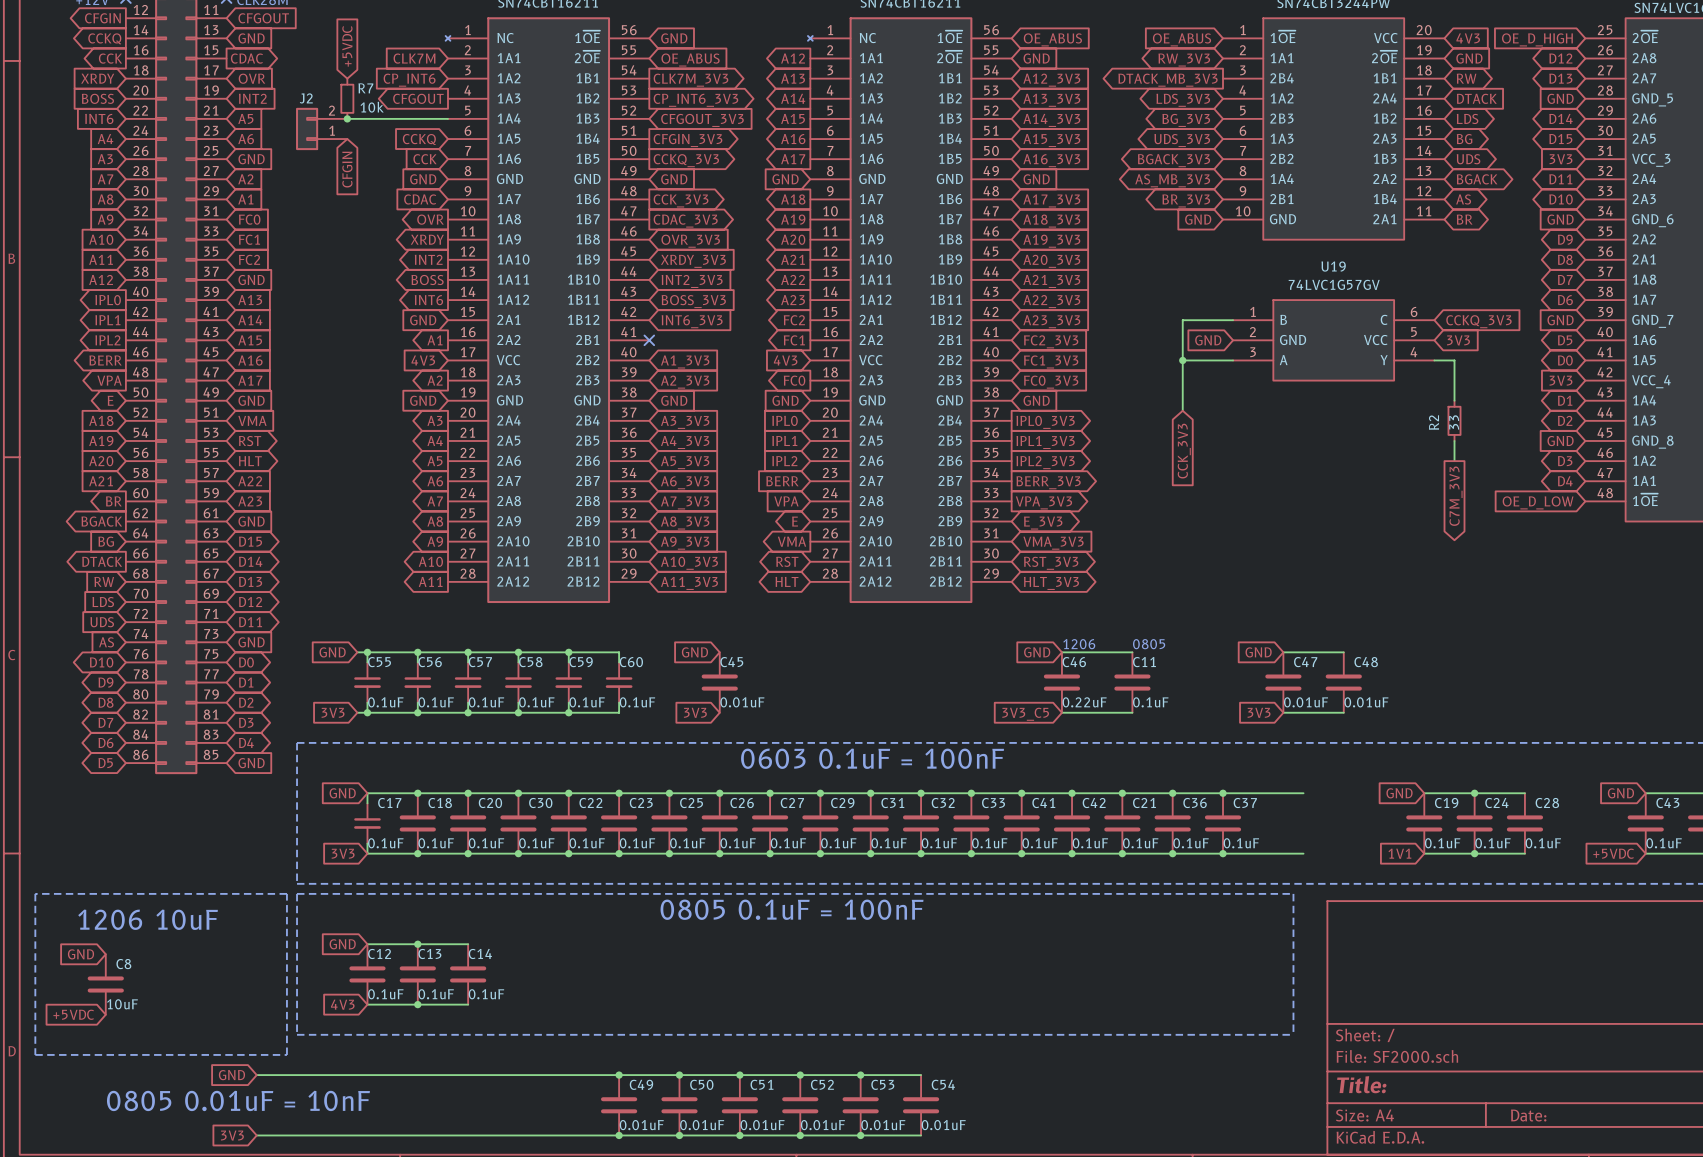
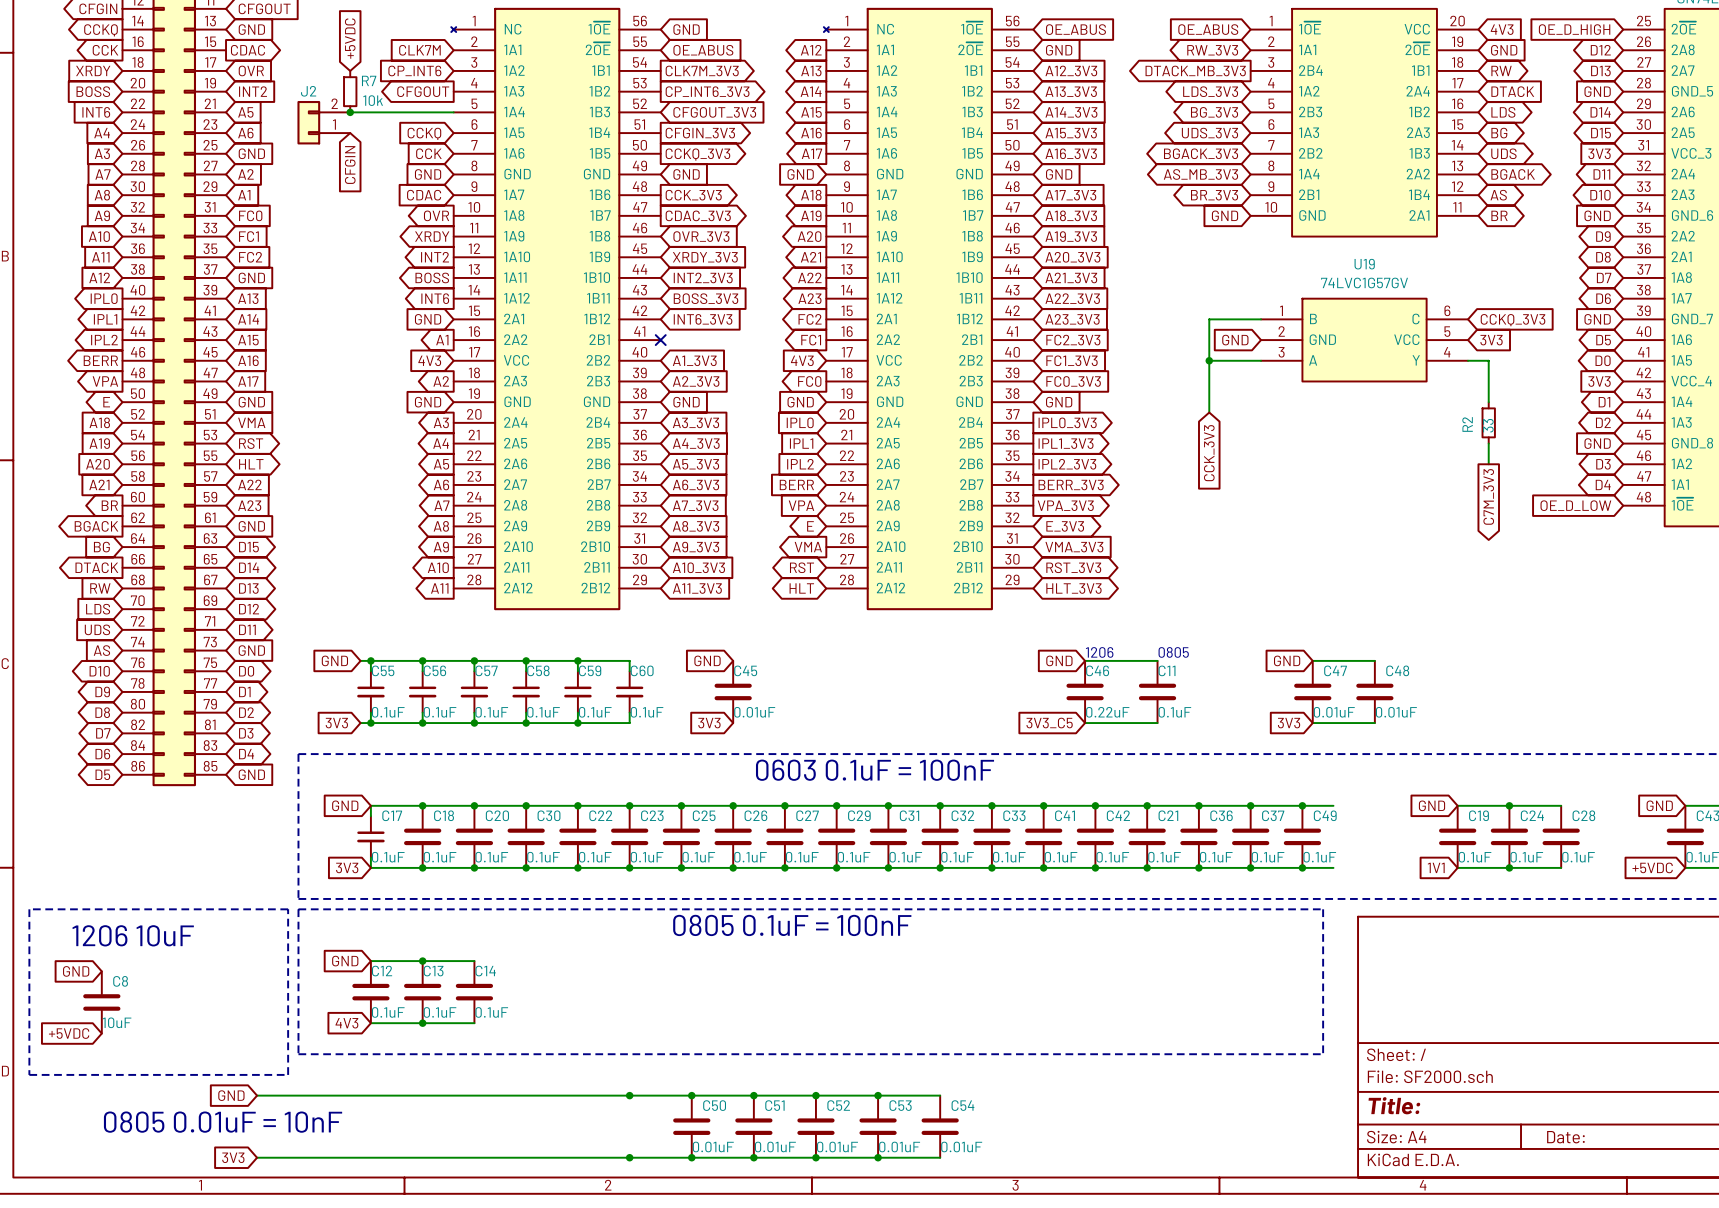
junction: none -> (1302, 805)
junction: none -> (1302, 867)
C49 position: (619, 1105) -> (1302, 836)
C49 value: 0.01uF (641, 1125) -> 0.1uF (1319, 857)

